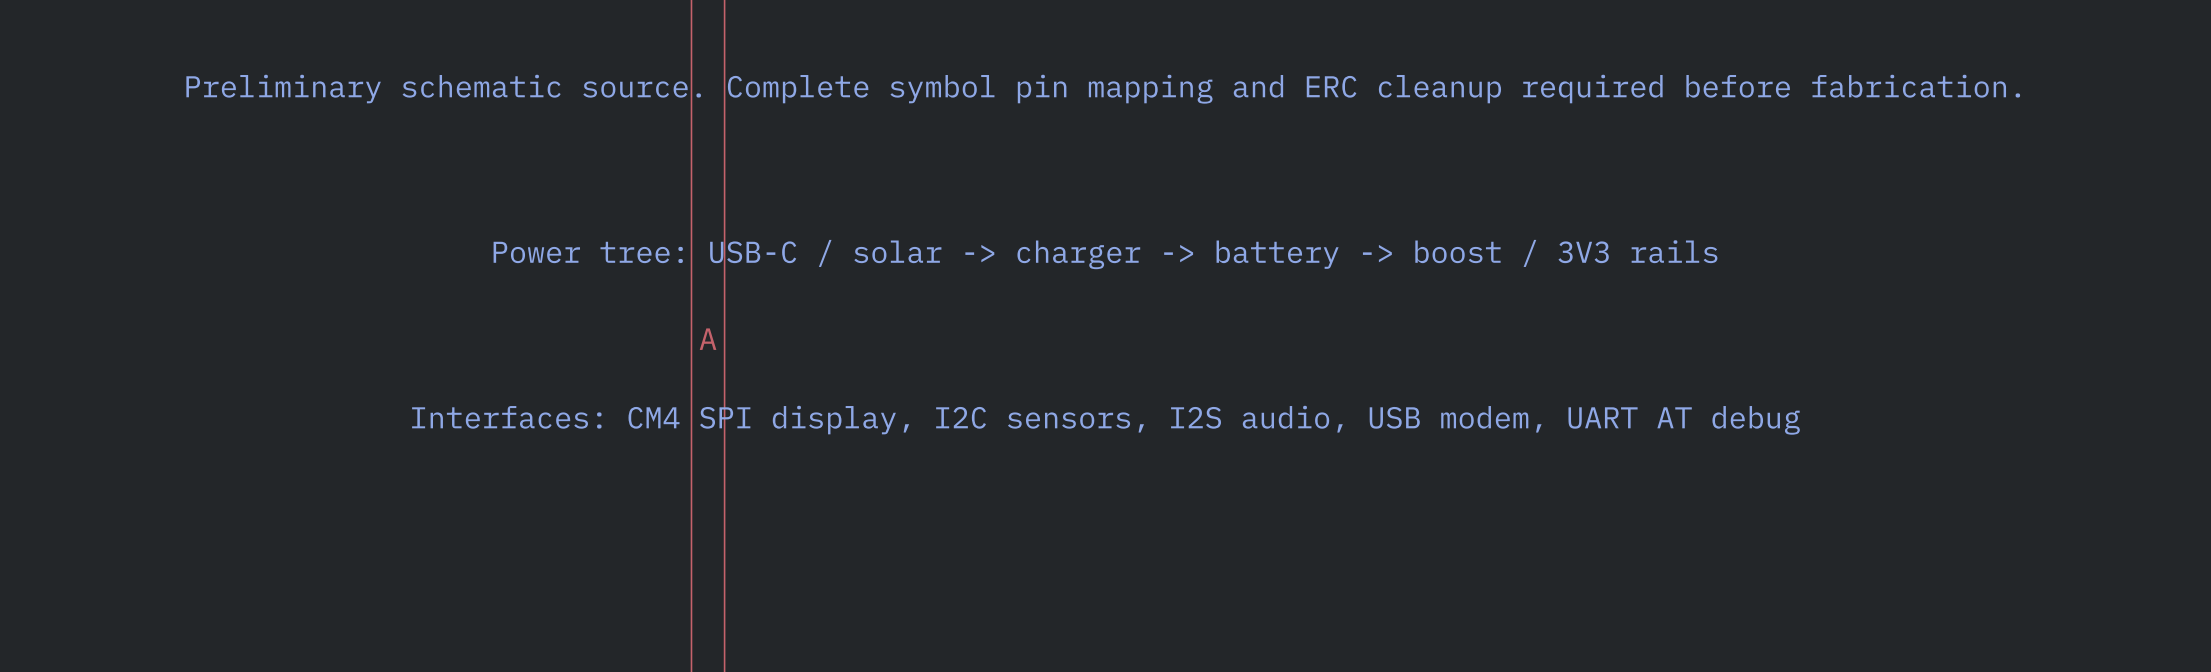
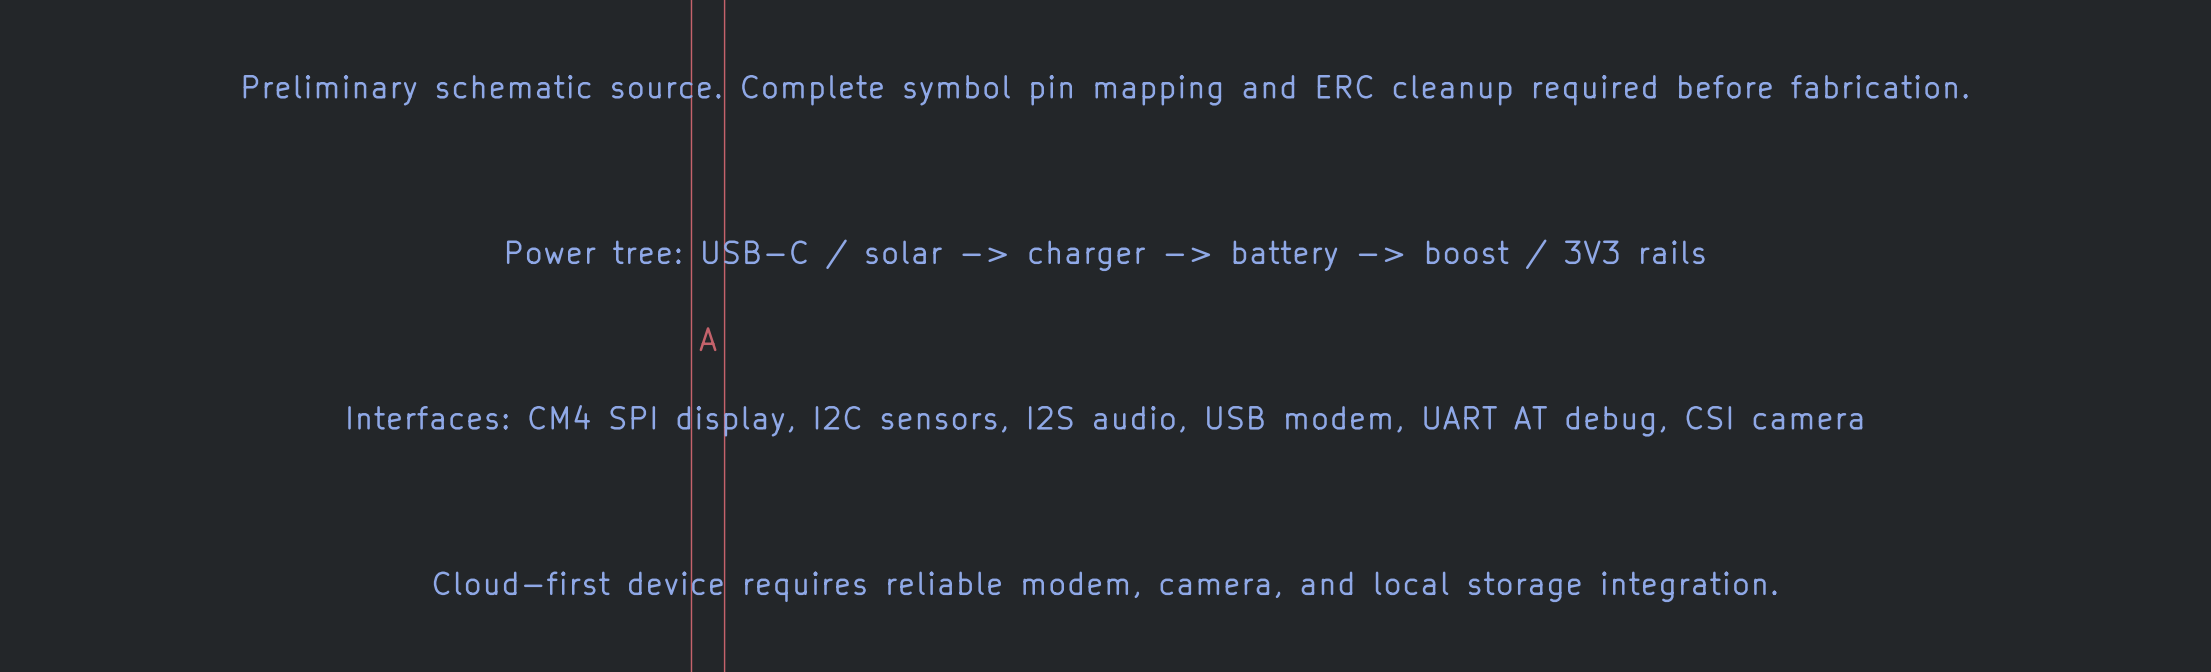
text: Interfaces: CM4 SPI display, I2C sensors, I2S audio, USB modem, UART AT debug (1105, 420) -> Interfaces: CM4 SPI display, I2C sensors, I2S audio, USB modem, UART AT debug, CSI camera (1105, 420)
text: none -> Cloud-first device requires reliable modem, camera, and local storage integration. (1105, 586)

